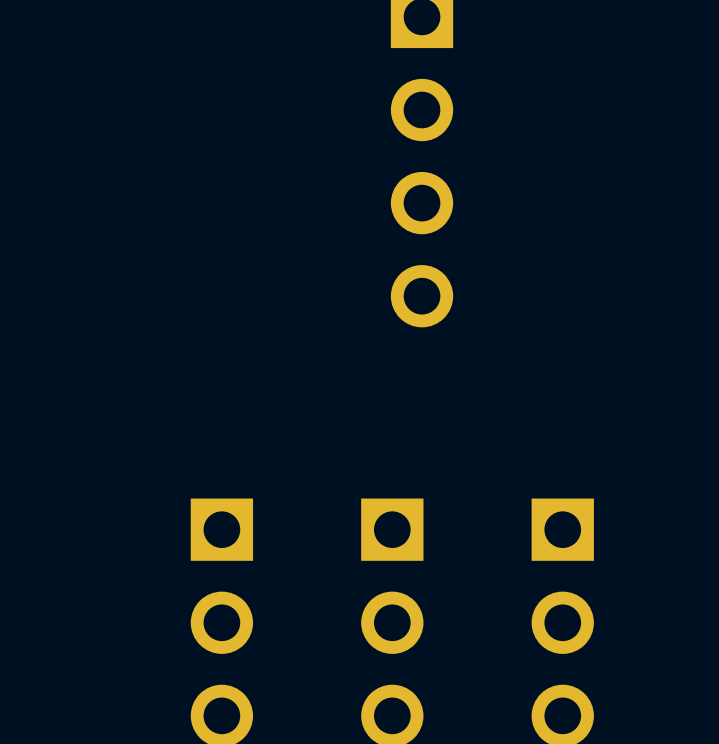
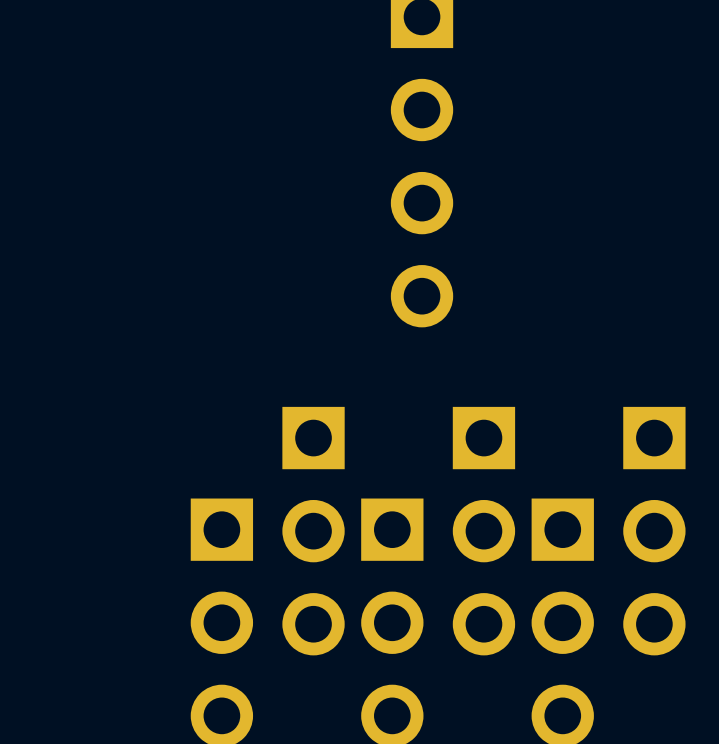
part: none -> (313, 531)
part: none -> (483, 531)
part: none -> (654, 531)

